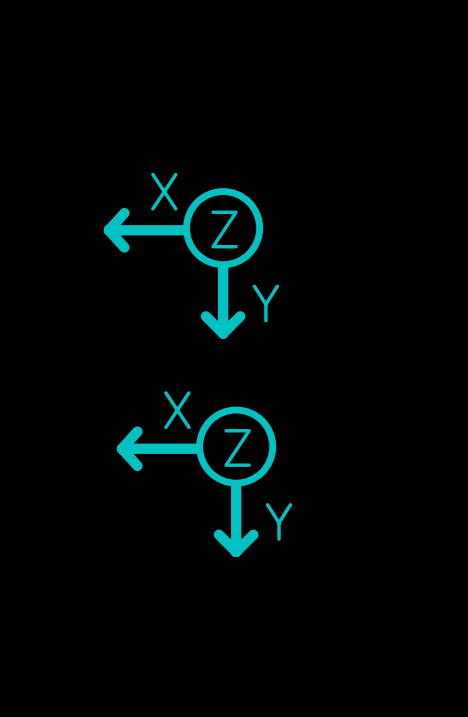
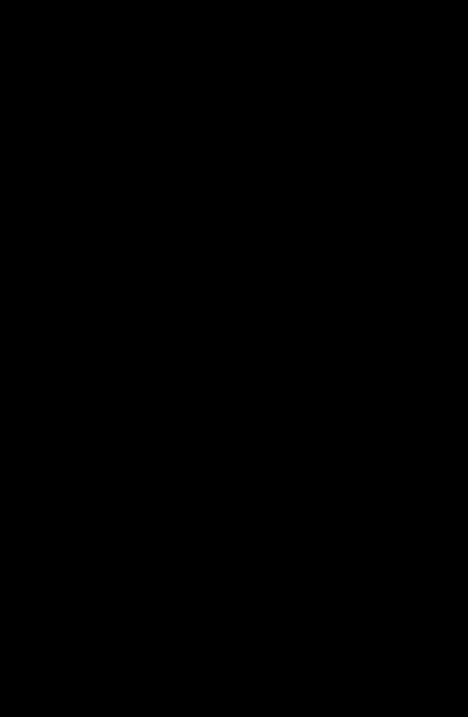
drawing: [183, 188, 264, 269] -> none
text: X (164, 191) -> none
line: (124, 213) (108, 230) -> none
text: Z (224, 229) -> none
line: (108, 230) (124, 247) -> none
line: (108, 230) (182, 230) -> none
line: (223, 266) (223, 333) -> none
text: Y (265, 303) -> none
line: (205, 316) (223, 333) -> none
line: (240, 316) (223, 333) -> none
drawing: [196, 406, 277, 487] -> none
text: X (177, 410) -> none
line: (137, 431) (122, 448) -> none
text: Z (237, 447) -> none
line: (122, 448) (137, 465) -> none
line: (122, 448) (195, 448) -> none
line: (236, 485) (236, 551) -> none
text: Y (279, 521) -> none
line: (218, 534) (236, 551) -> none
line: (253, 534) (236, 551) -> none

